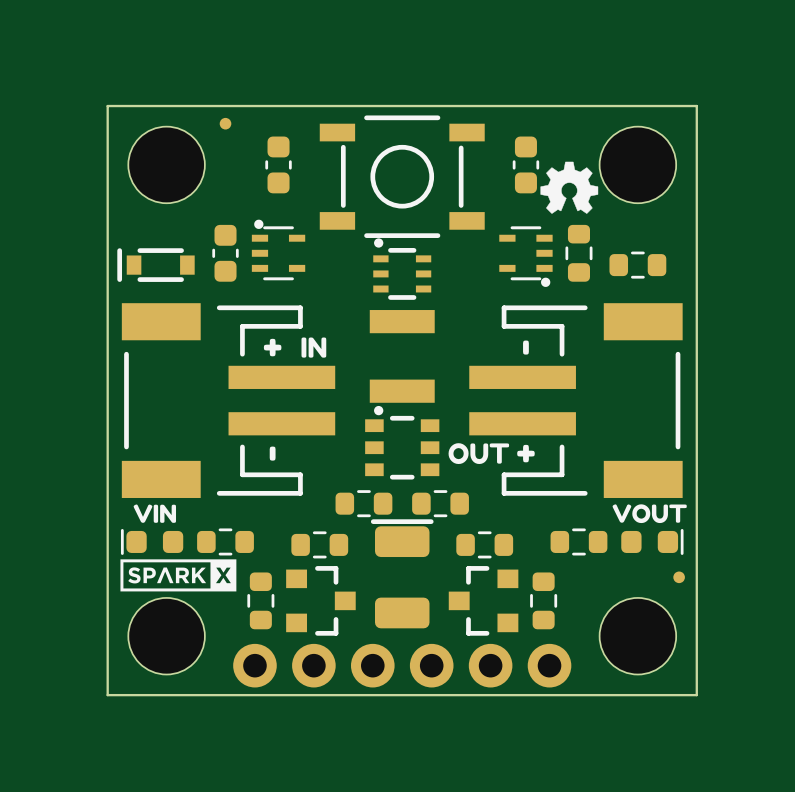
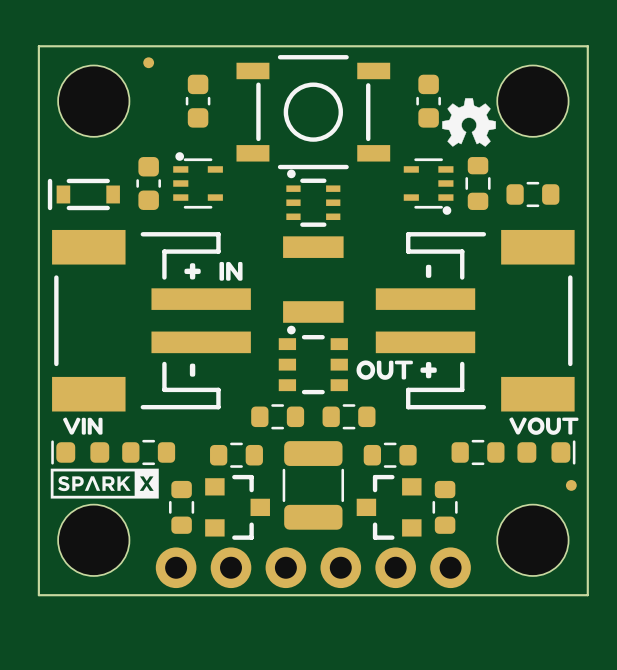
part footprint: [370, 519, 434, 629] -> [282, 441, 345, 530]

